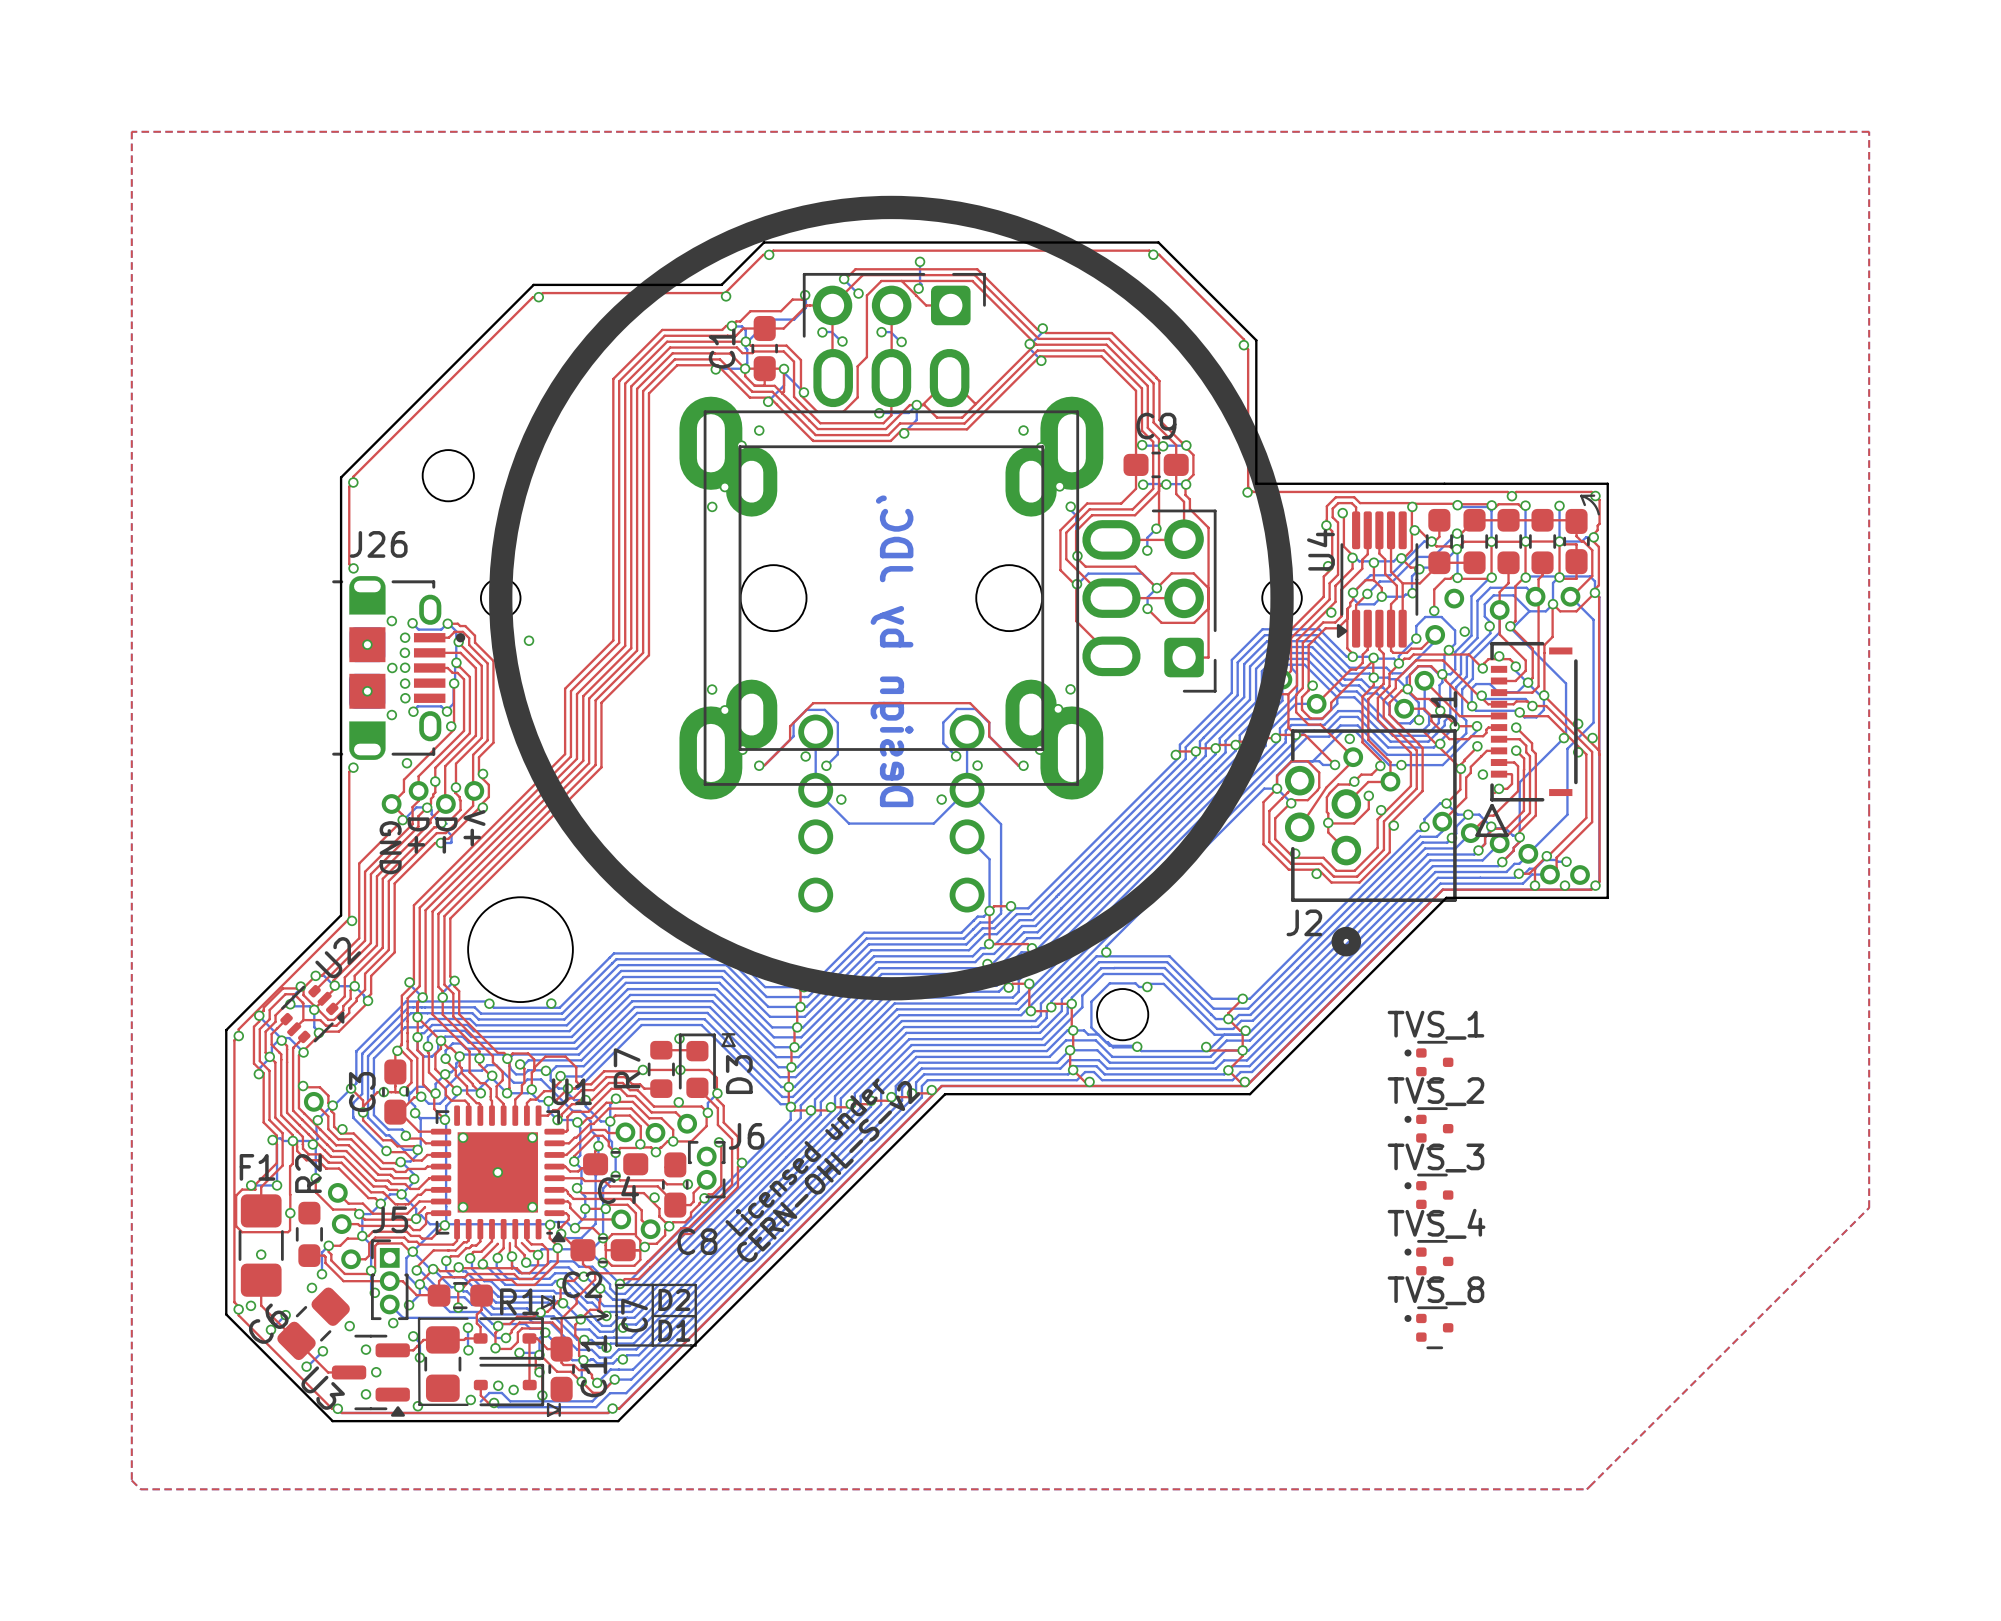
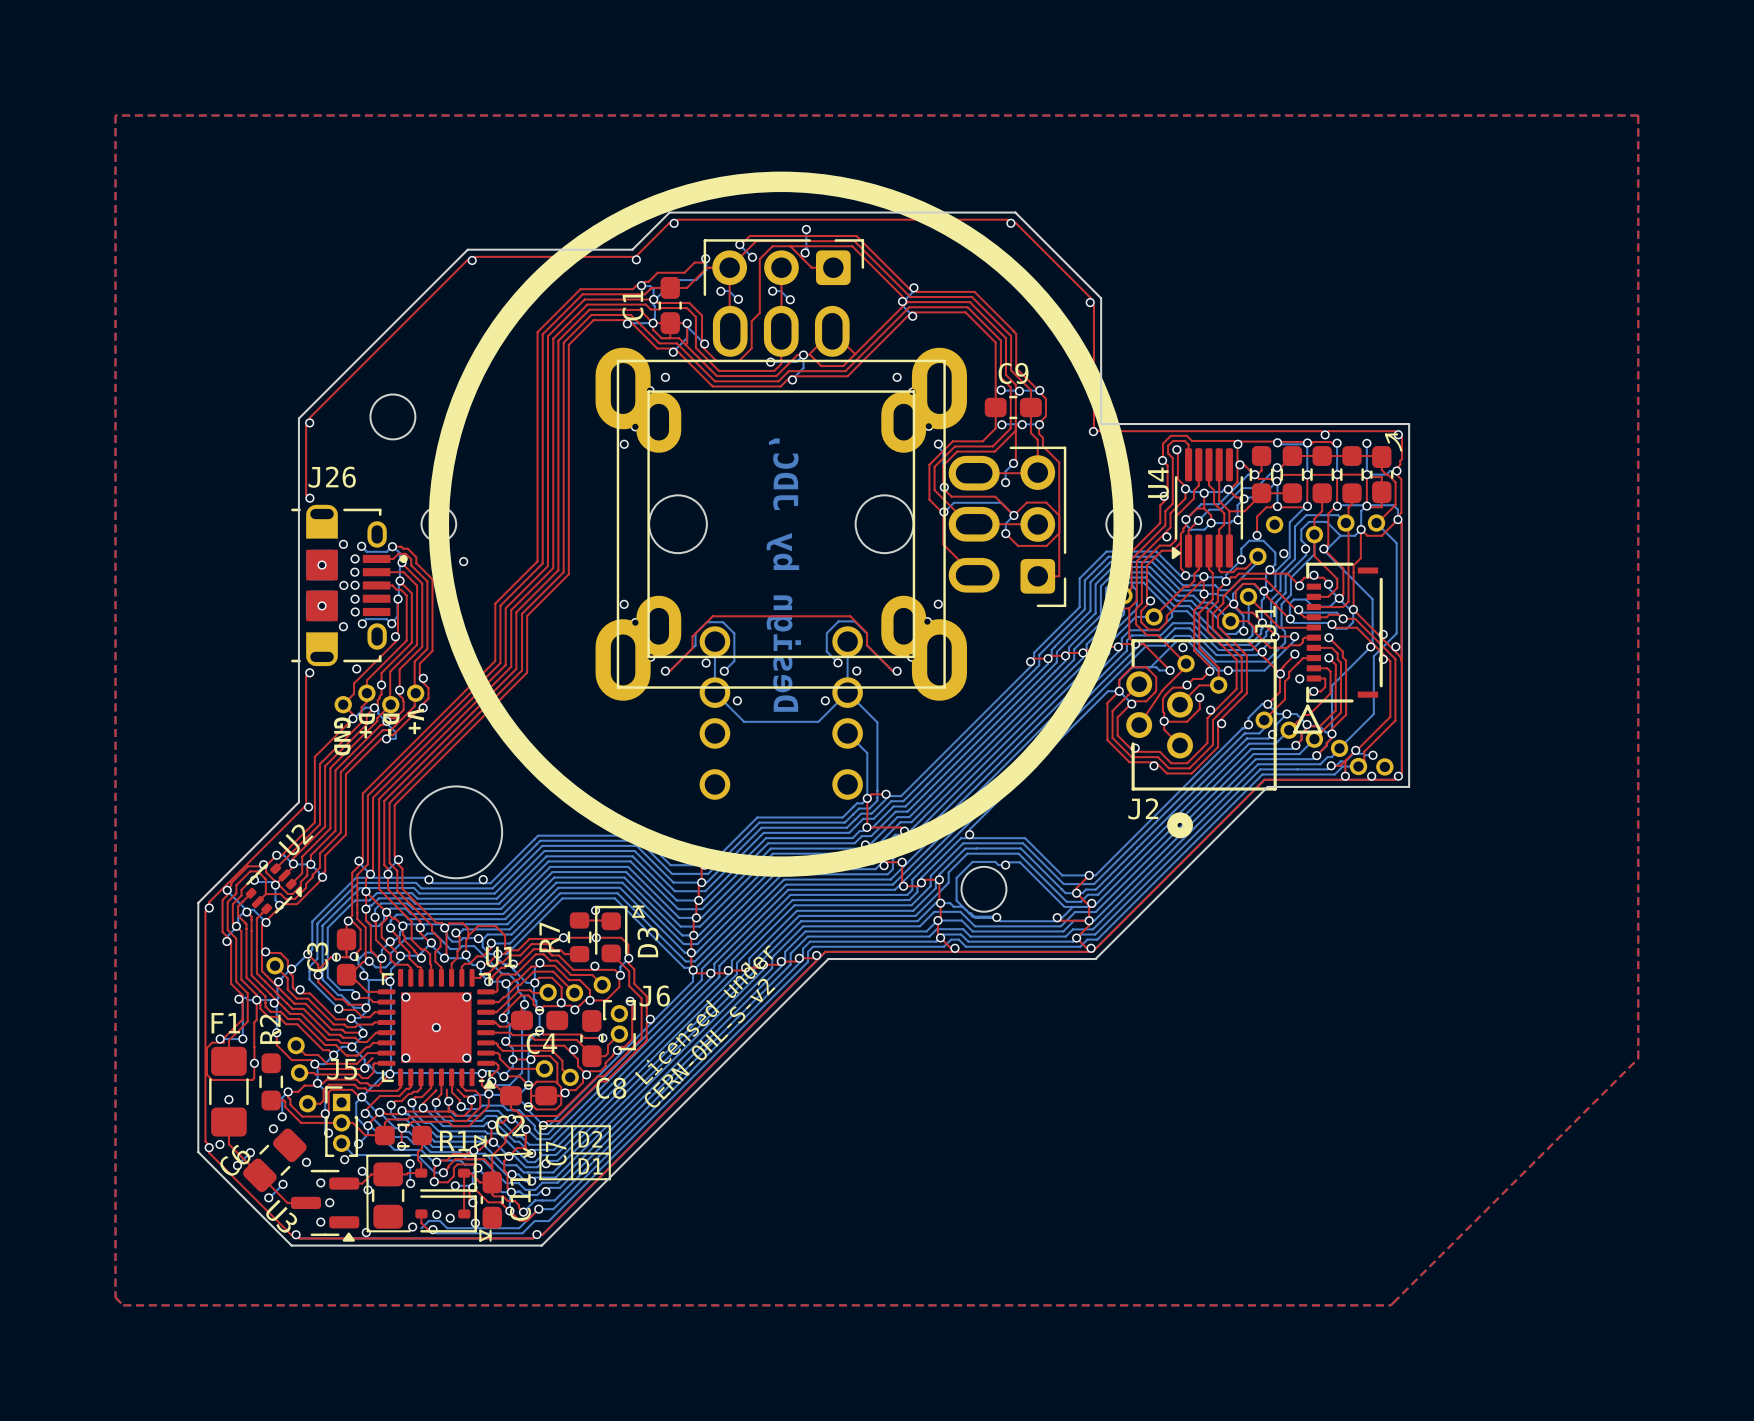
TVS_1: (1428, 1062) -> none
TVS_2: (1428, 1128) -> none
TVS_3: (1428, 1195) -> none
TVS_4: (1428, 1261) -> none
TVS_8: (1428, 1327) -> none

